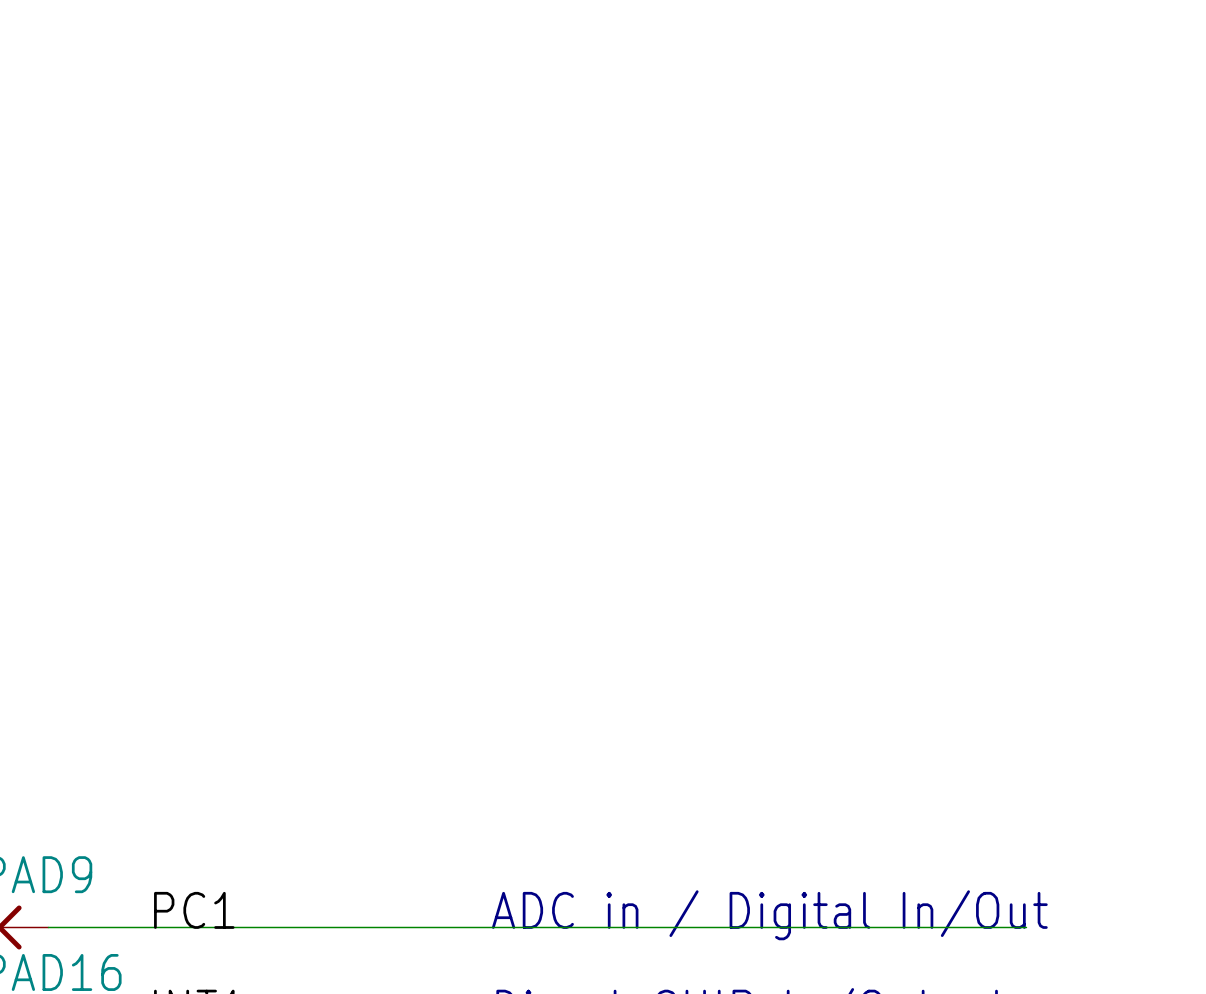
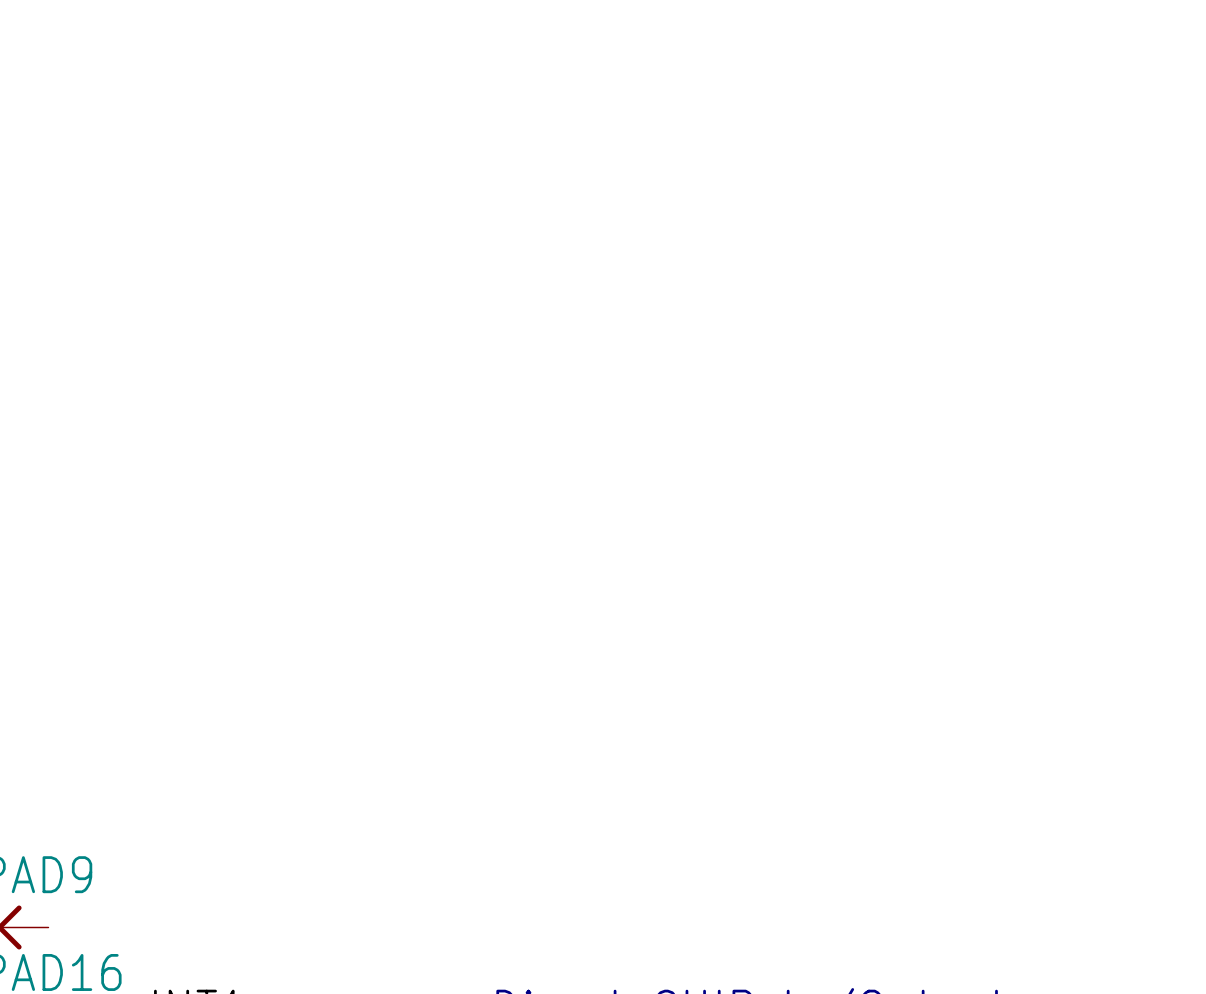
label: PC1 (194, 910) -> none
text: ADC in / Digital In/Out (769, 915) -> none
wire: (48, 927) (1026, 927) -> none

